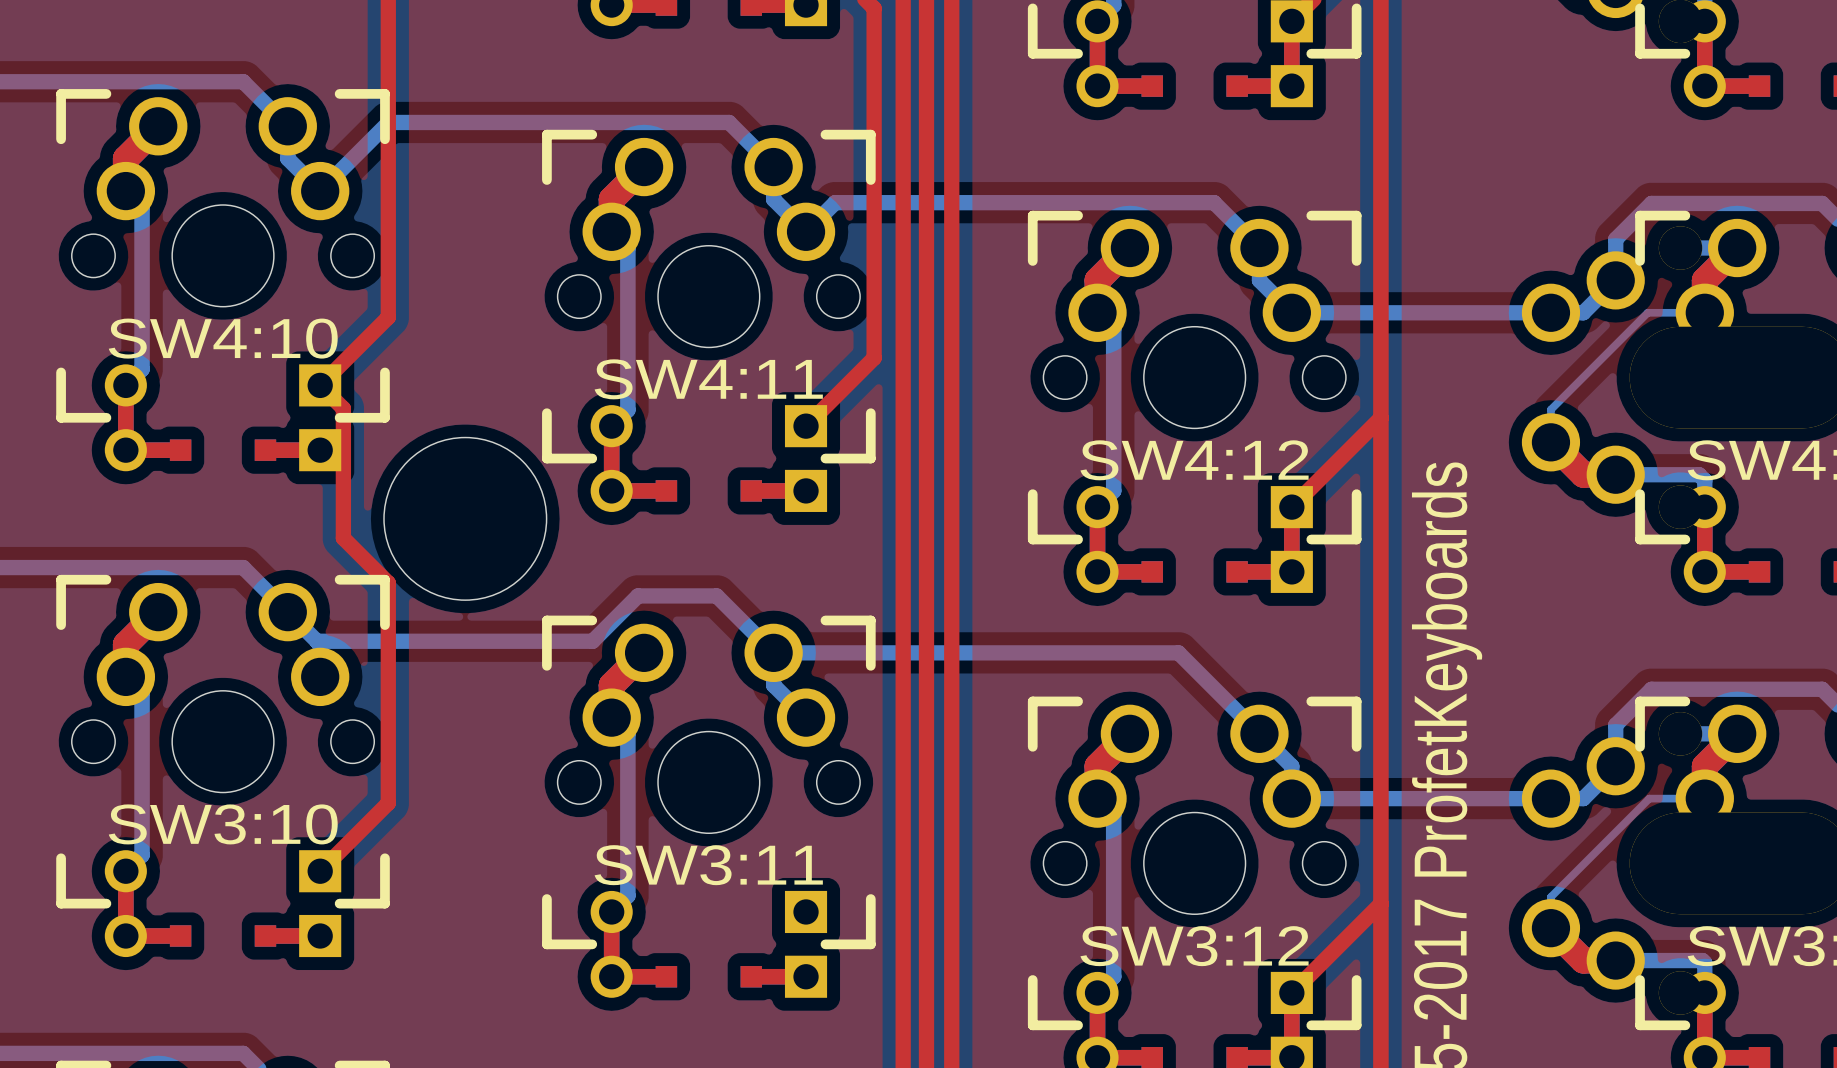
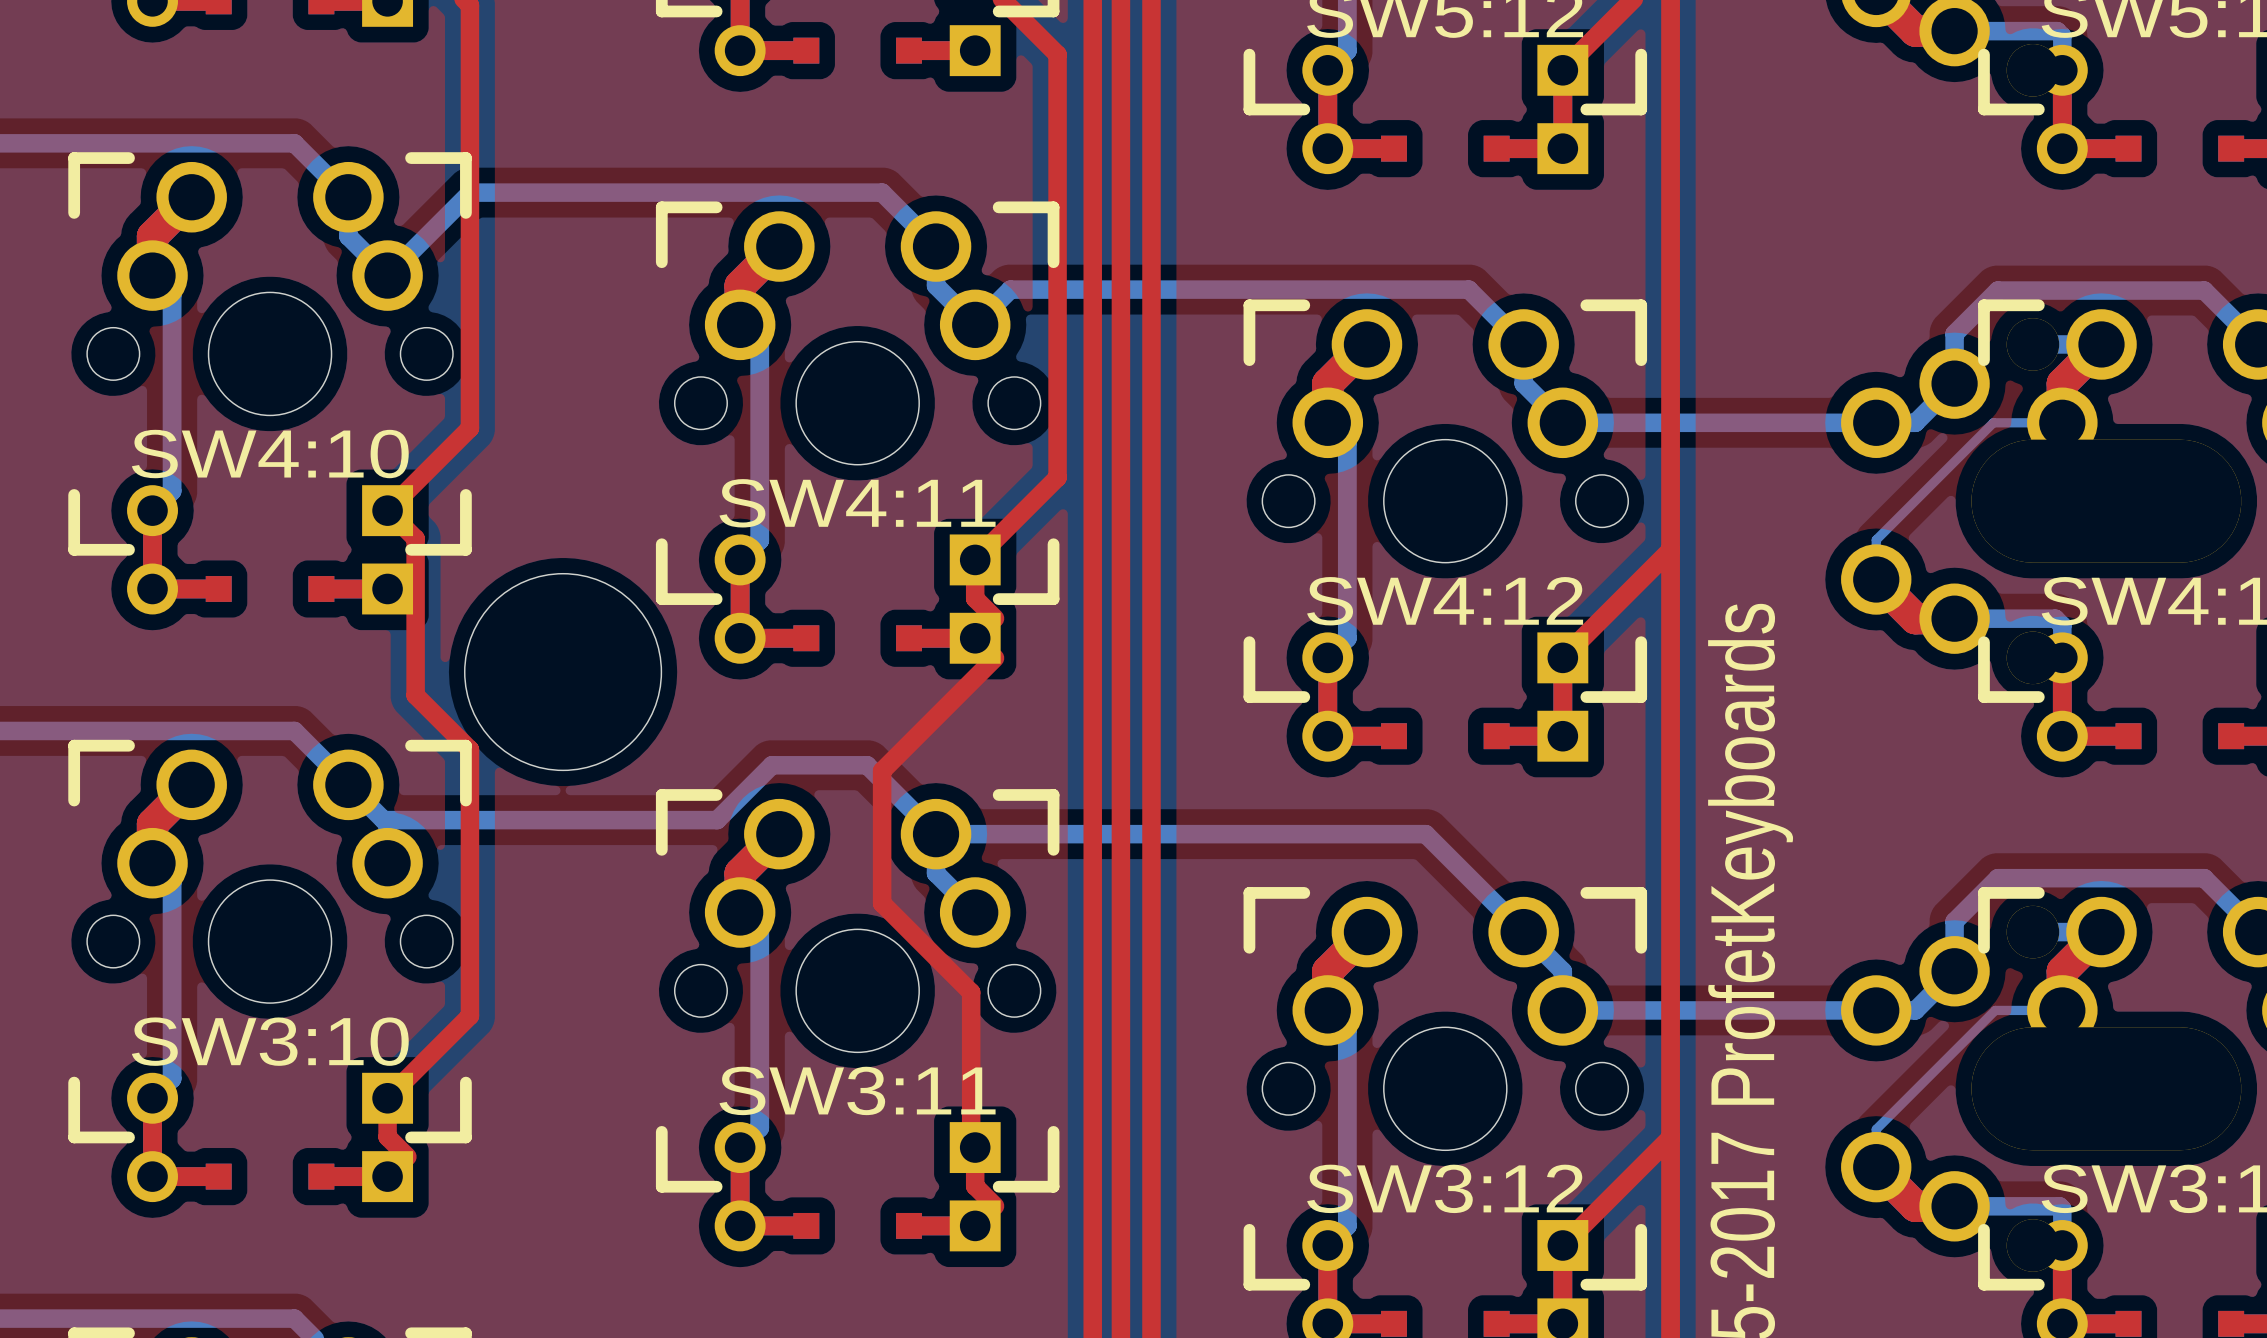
top track: none -> (975, 559) (975, 598) (995, 618)
top track: none -> (995, 658) (882, 771) (882, 903) (971, 992) (971, 1143) (975, 1147) (975, 1186) (995, 1206)
top track: none -> (387, 1098) (387, 1136) (407, 1156)

